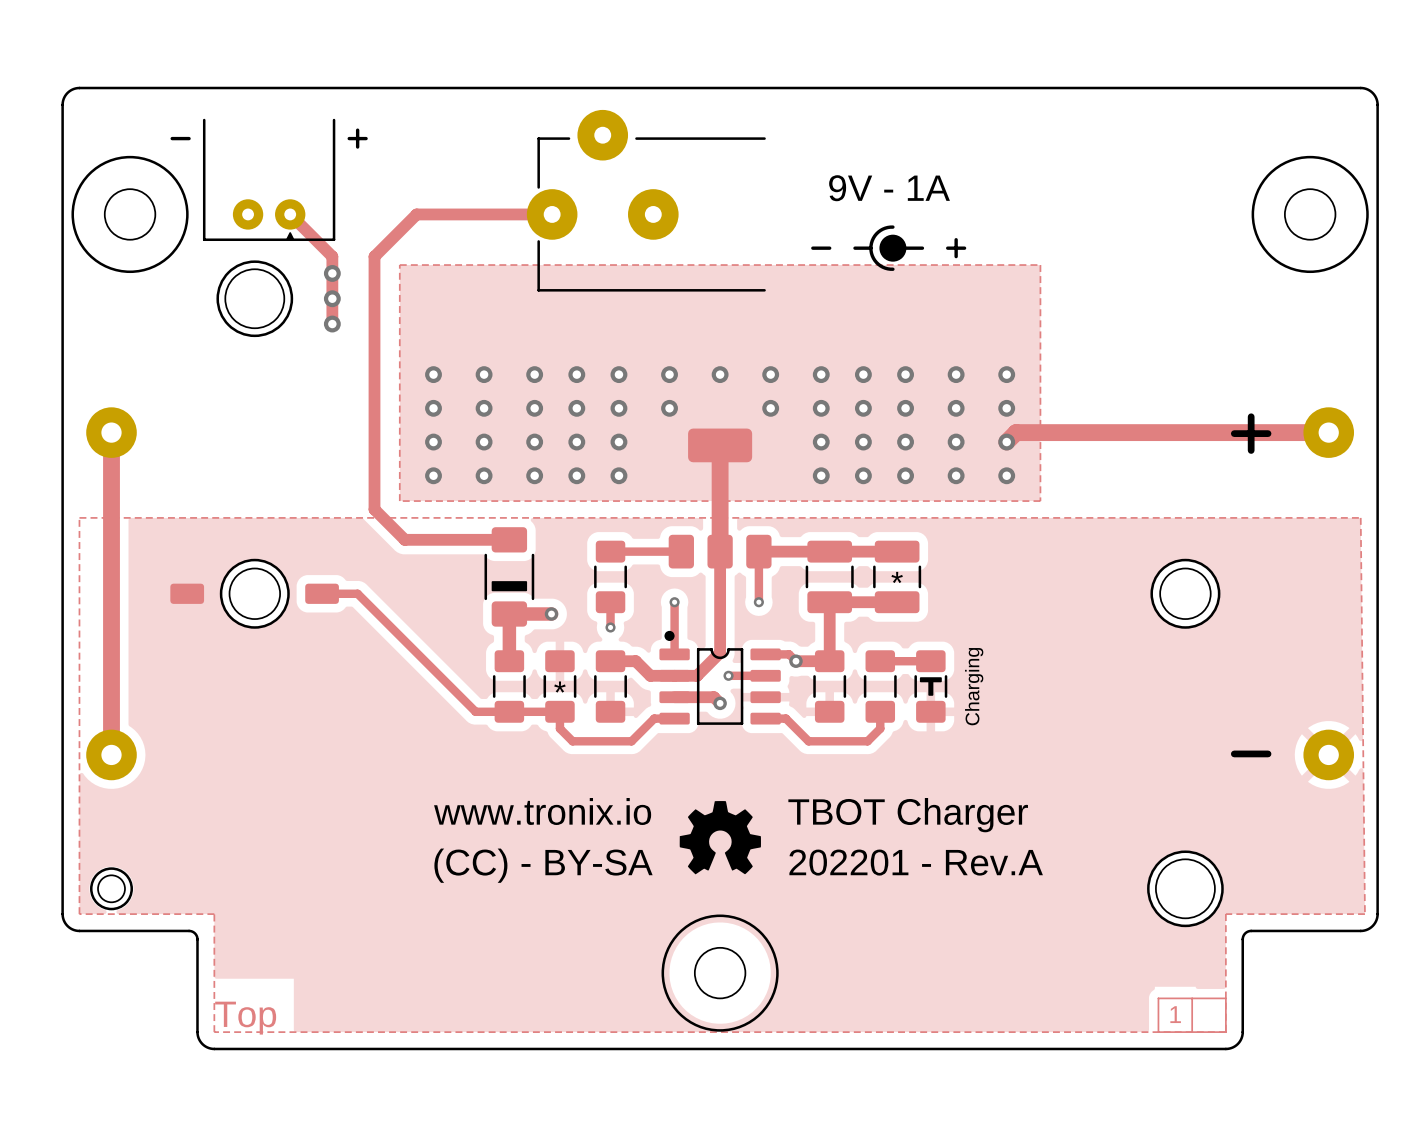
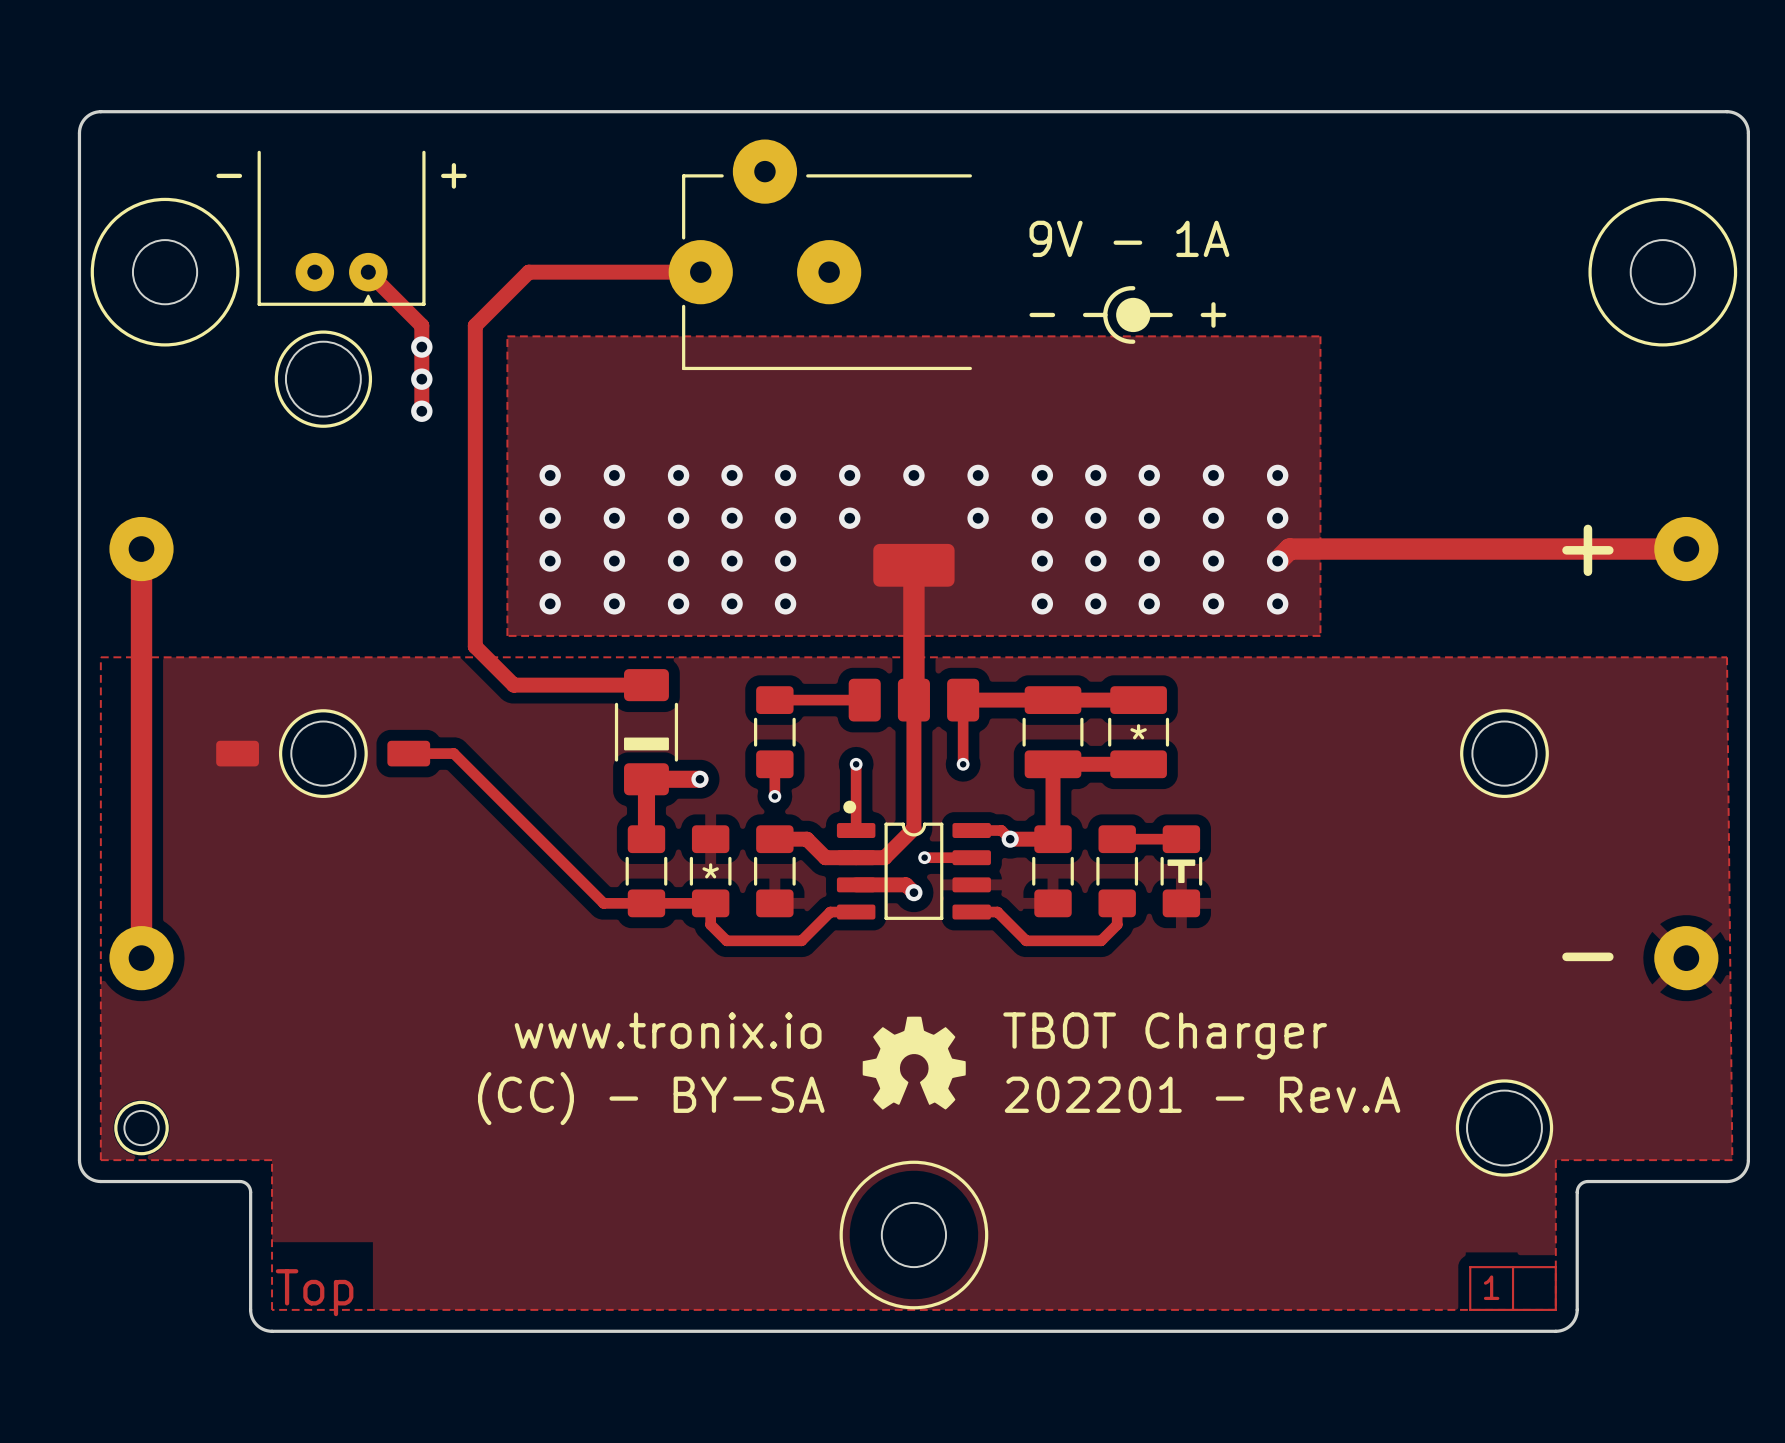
text: Charging (974, 686) -> none

